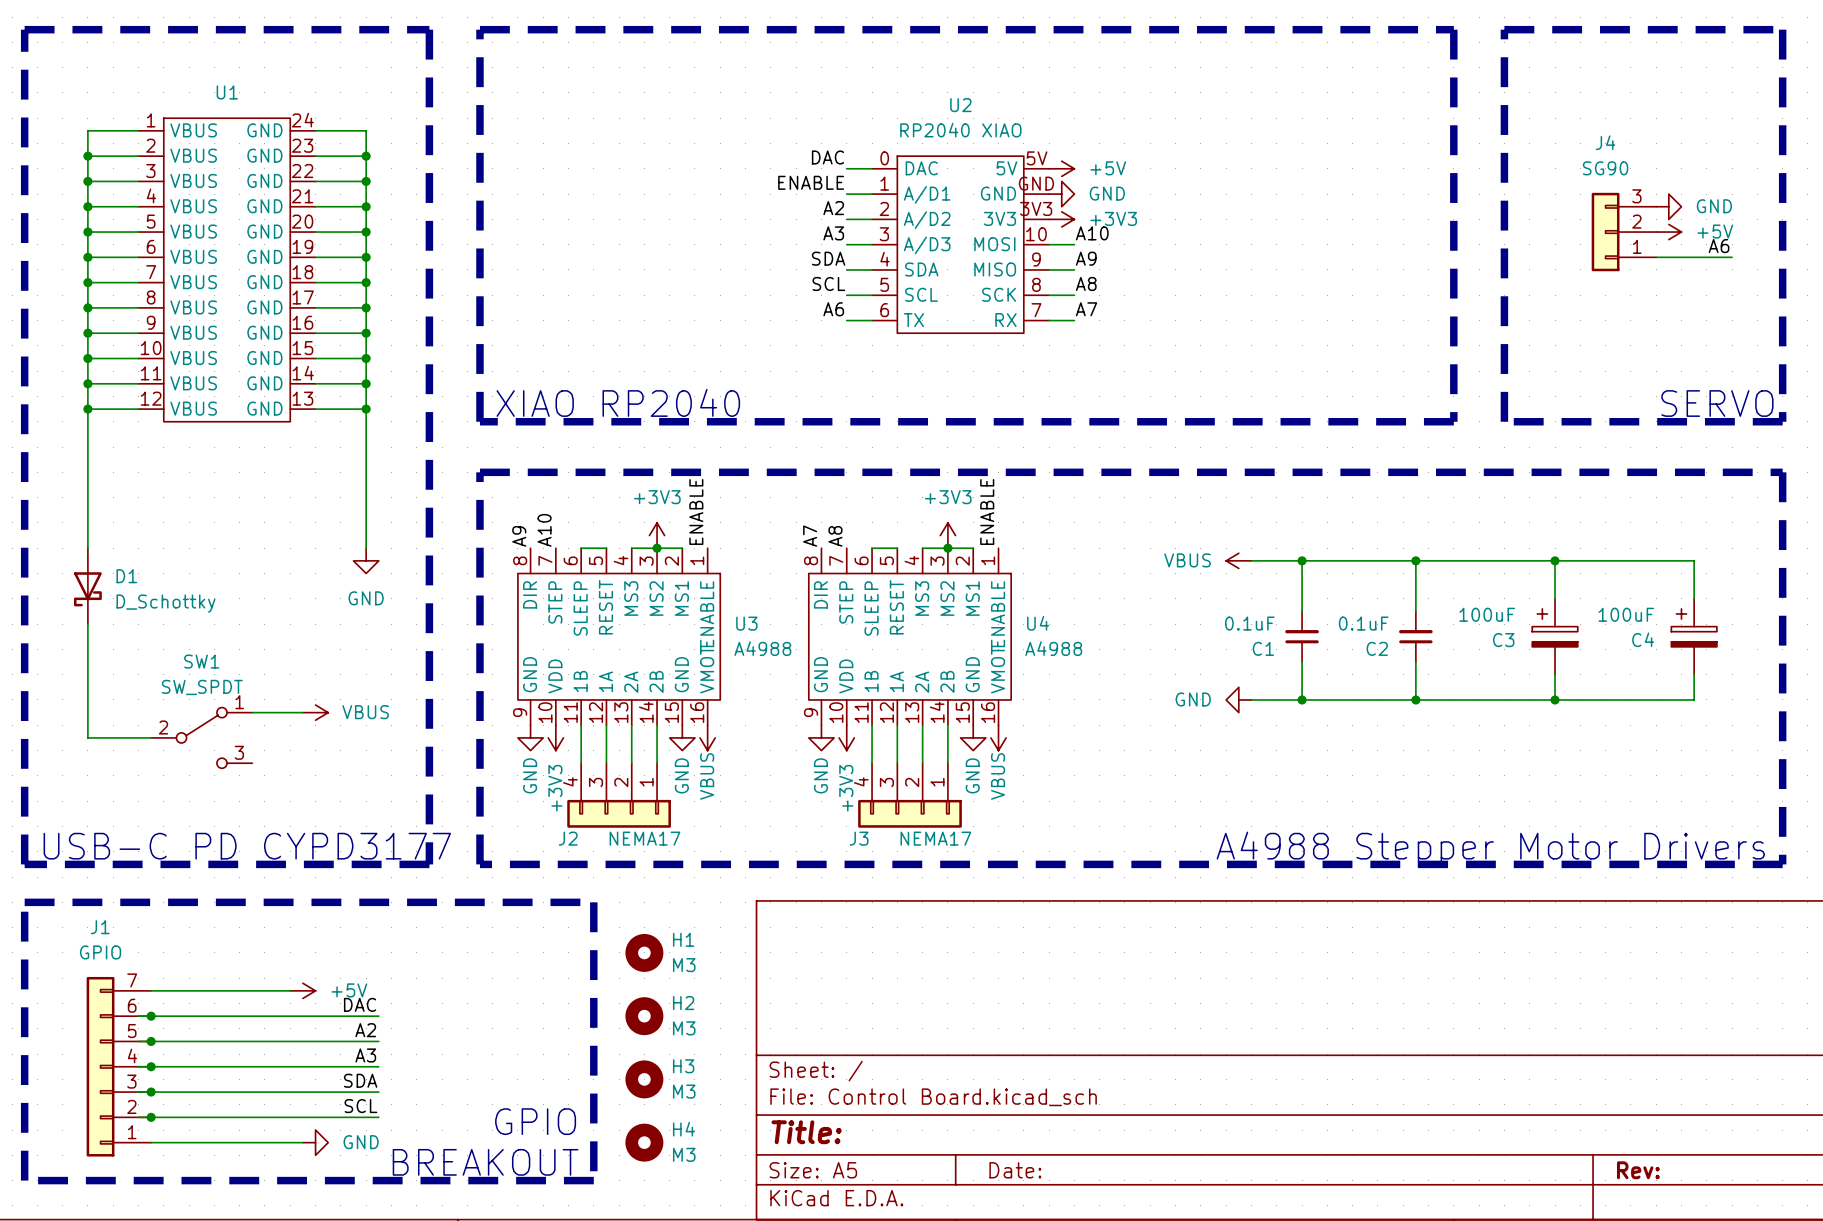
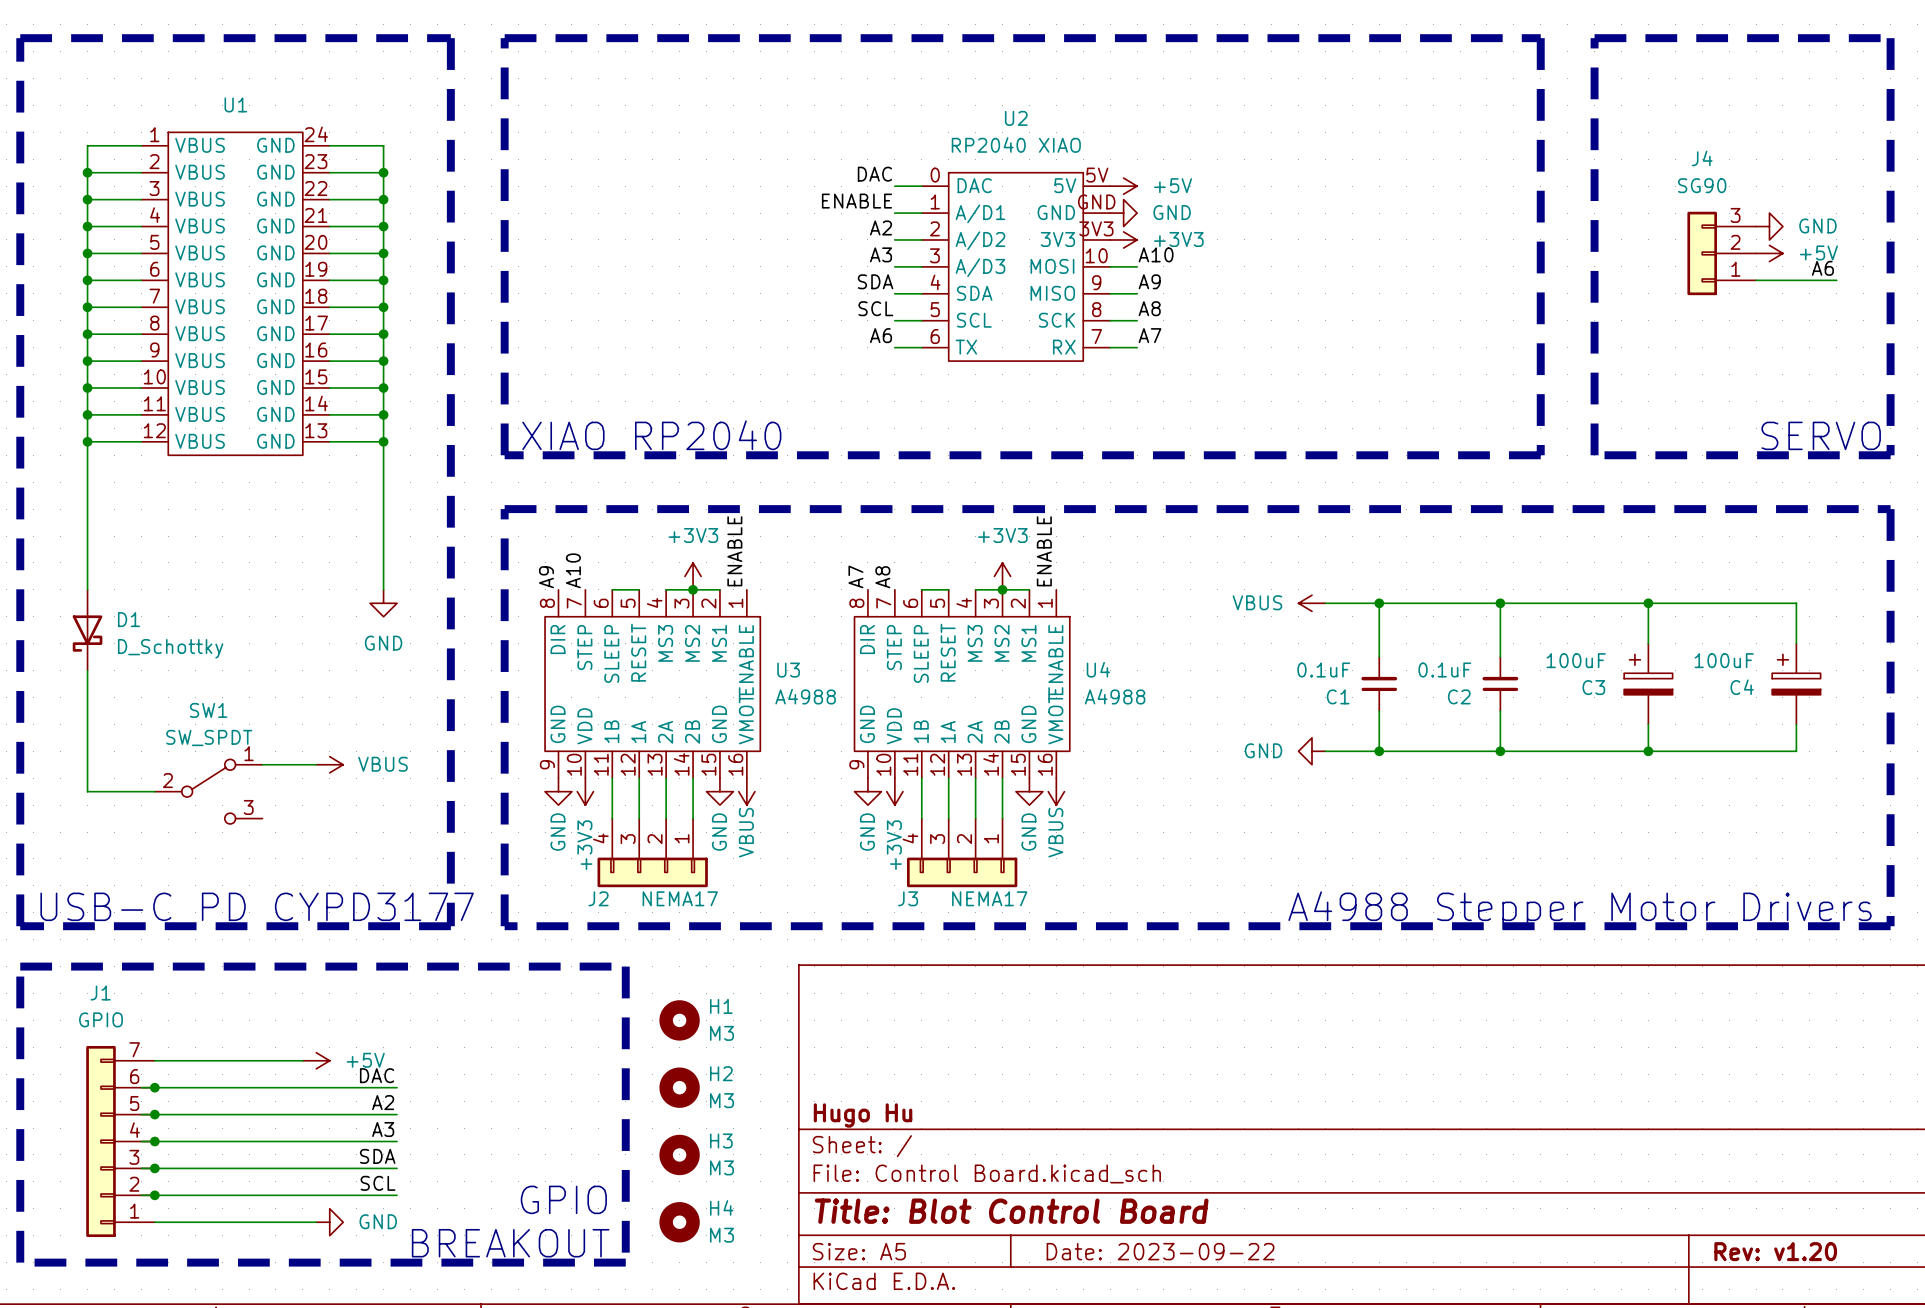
title block: none -> Hugo Hu (863, 1115)
title block: Title: (806, 1132) -> Title: Blot Control Board (1011, 1211)
title block: Date: (1015, 1170) -> Date: 2023-09-22 (1160, 1251)
title block: Rev: (1638, 1170) -> Rev: v1.20 (1775, 1251)

